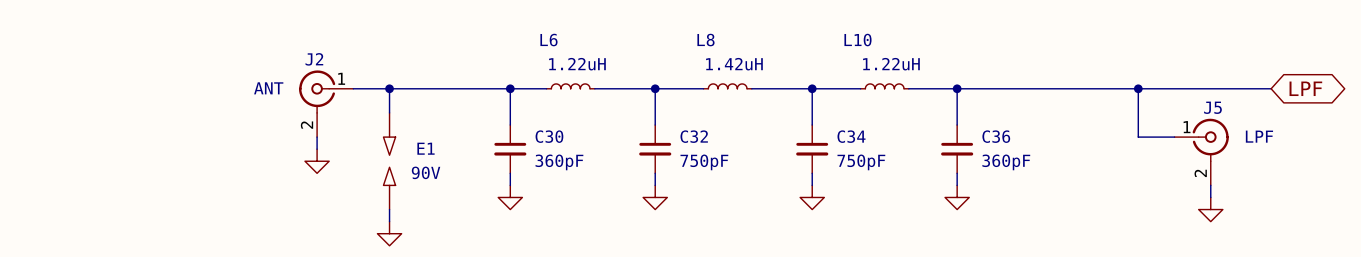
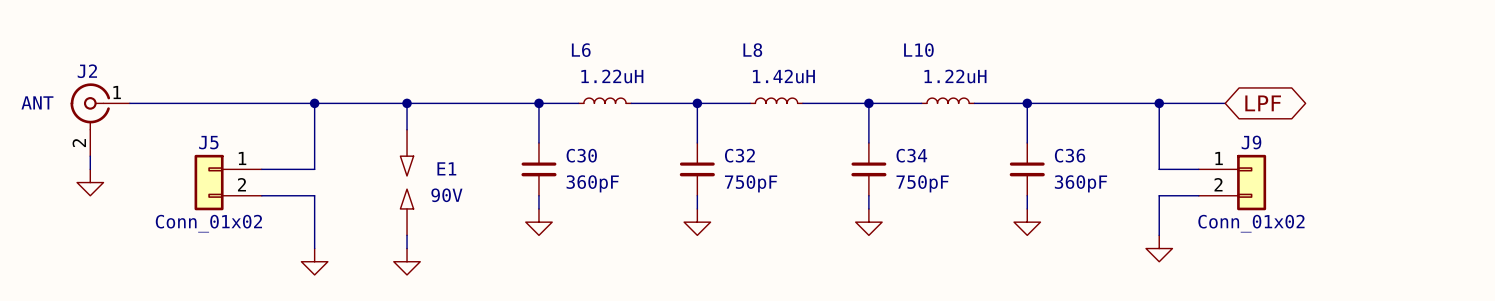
wire: none -> (129, 103) (367, 103)
wire: none -> (314, 103) (314, 169) (261, 169)
junction: none -> (314, 103)
wire: none -> (1159, 103) (1159, 169) (1198, 169)
junction: none -> (1159, 103)
junction: (1138, 88) -> none
wire: (1271, 88) (1138, 88) (1138, 137) (1174, 137) -> none
global label position: LPF (1305, 88) -> LPF (1263, 103)
J2 position: (326, 103) -> (100, 119)
J5 name position: J5 (1212, 107) -> J5 (208, 142)
J5 symbol: [1174, 118, 1229, 186] -> [194, 154, 262, 211]
J5 value: LPF (1259, 136) -> Conn_01x02 (208, 223)
wire: (317, 137) (317, 149) -> (90, 156) (90, 169)
power symbol: none -> (90, 182)
power symbol position: (317, 161) -> (314, 261)
J9: none -> Conn_01x02 (1232, 182)
wire: none -> (261, 195) (314, 195) (314, 248)
wire: none -> (1198, 195) (1159, 195) (1159, 235)
wire: (1210, 185) (1210, 197) -> none
power symbol position: (1210, 209) -> (1159, 248)

